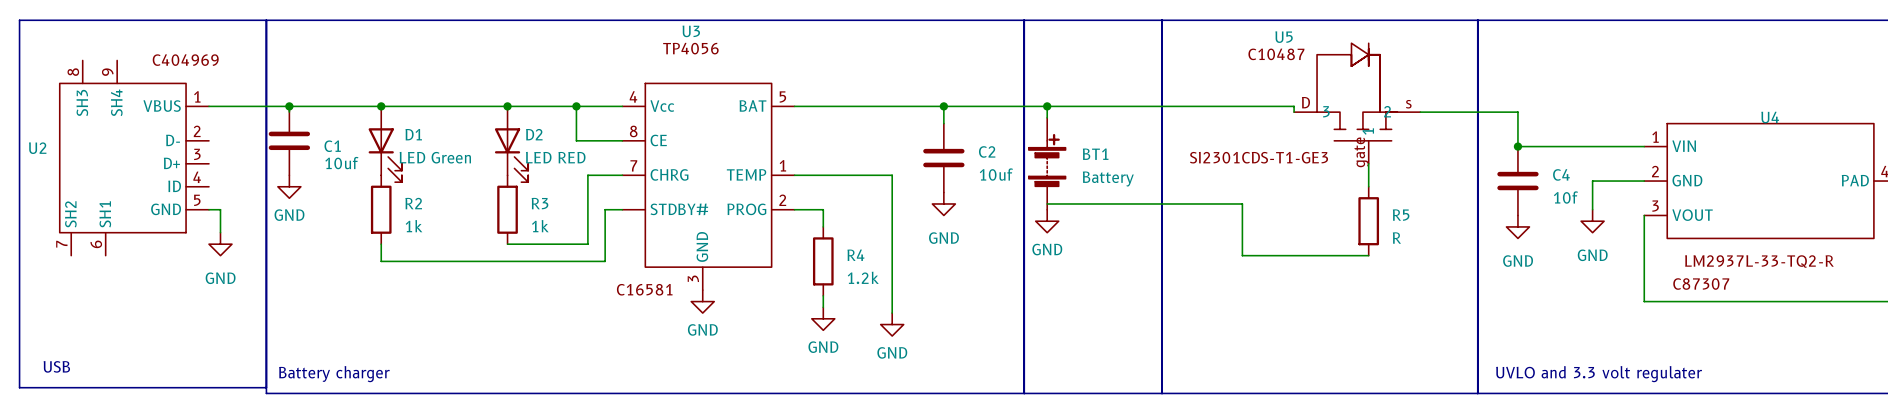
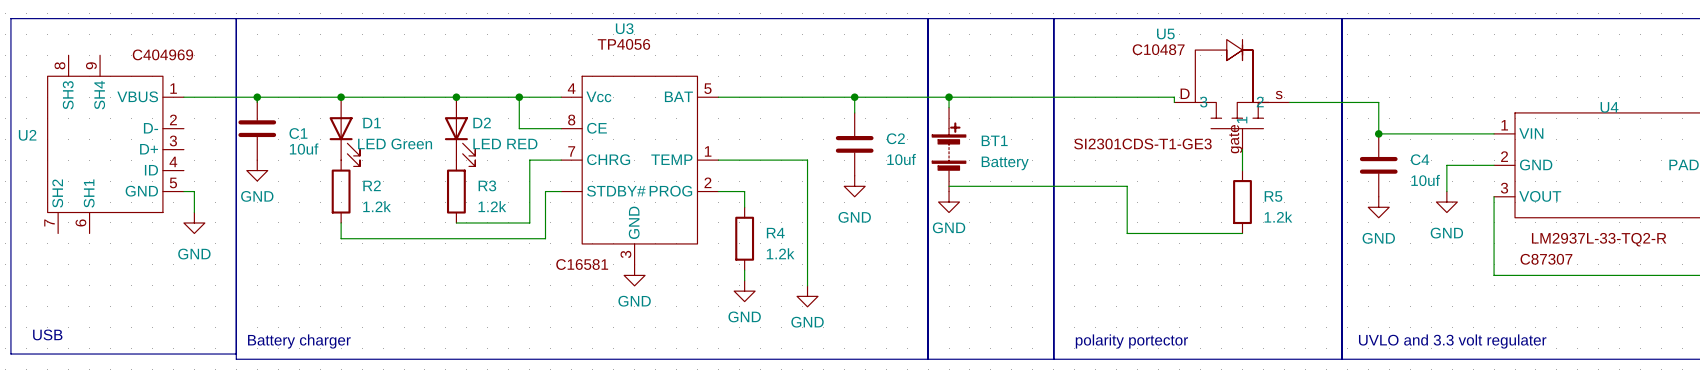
C4 value: 10f (1565, 197) -> 10uf (1425, 180)
R2 value: 1k (414, 226) -> 1.2k (377, 206)
R3 value: 1k (540, 226) -> 1.2k (492, 206)
R5 value: R (1396, 238) -> 1.2k (1278, 217)
text: none -> polarity portector (1131, 341)

